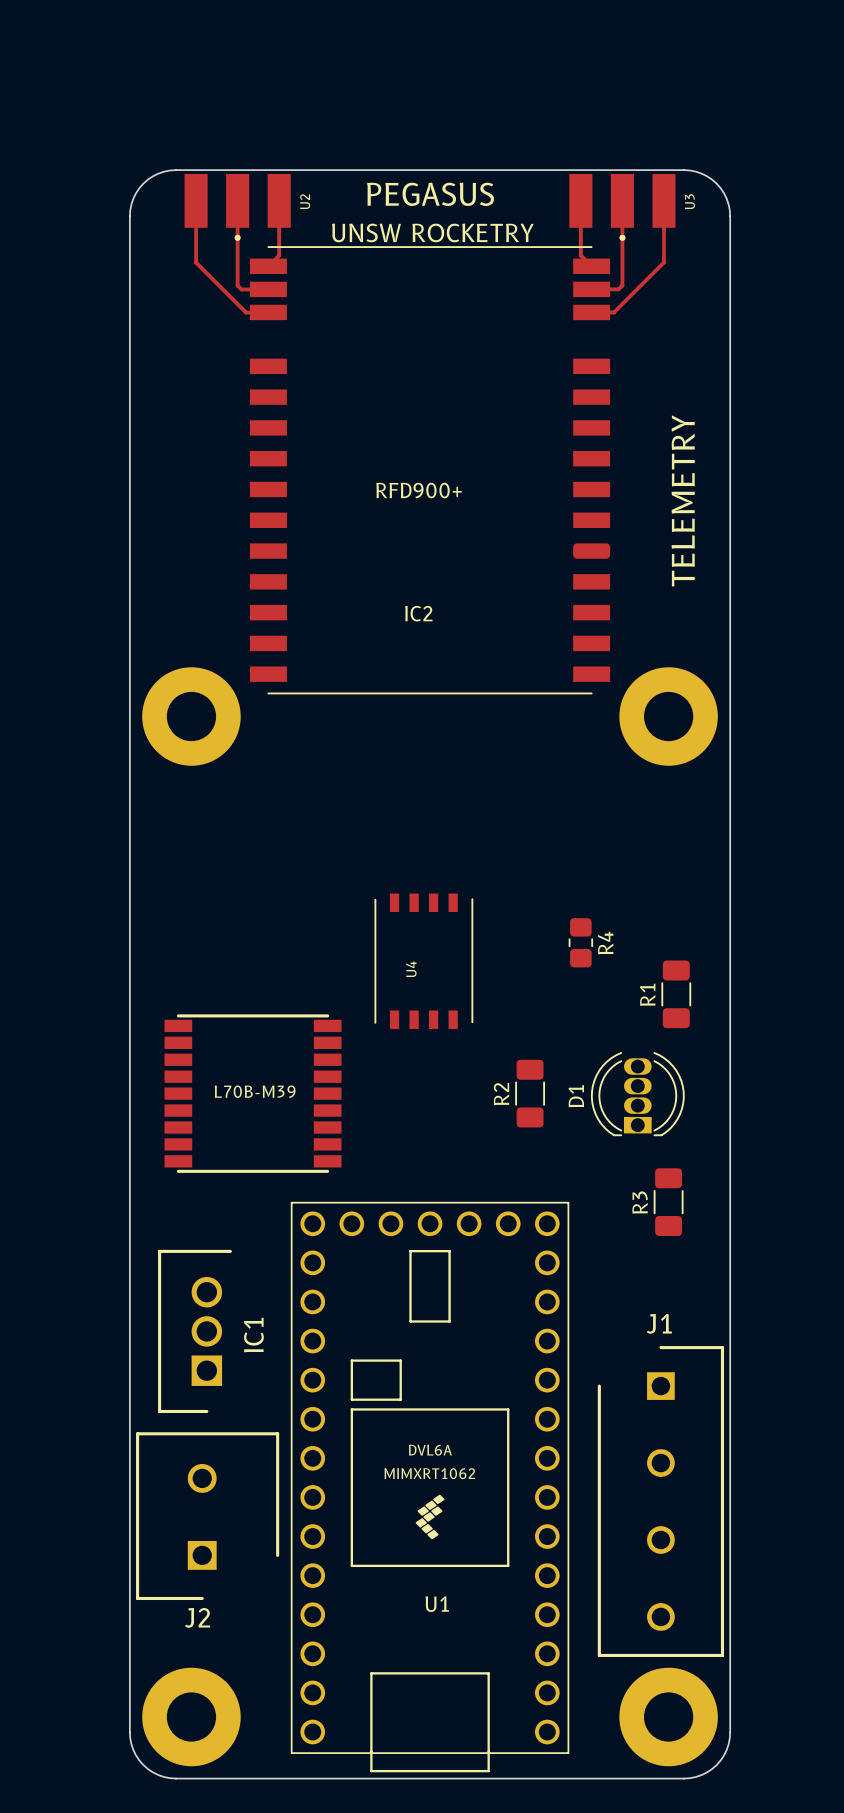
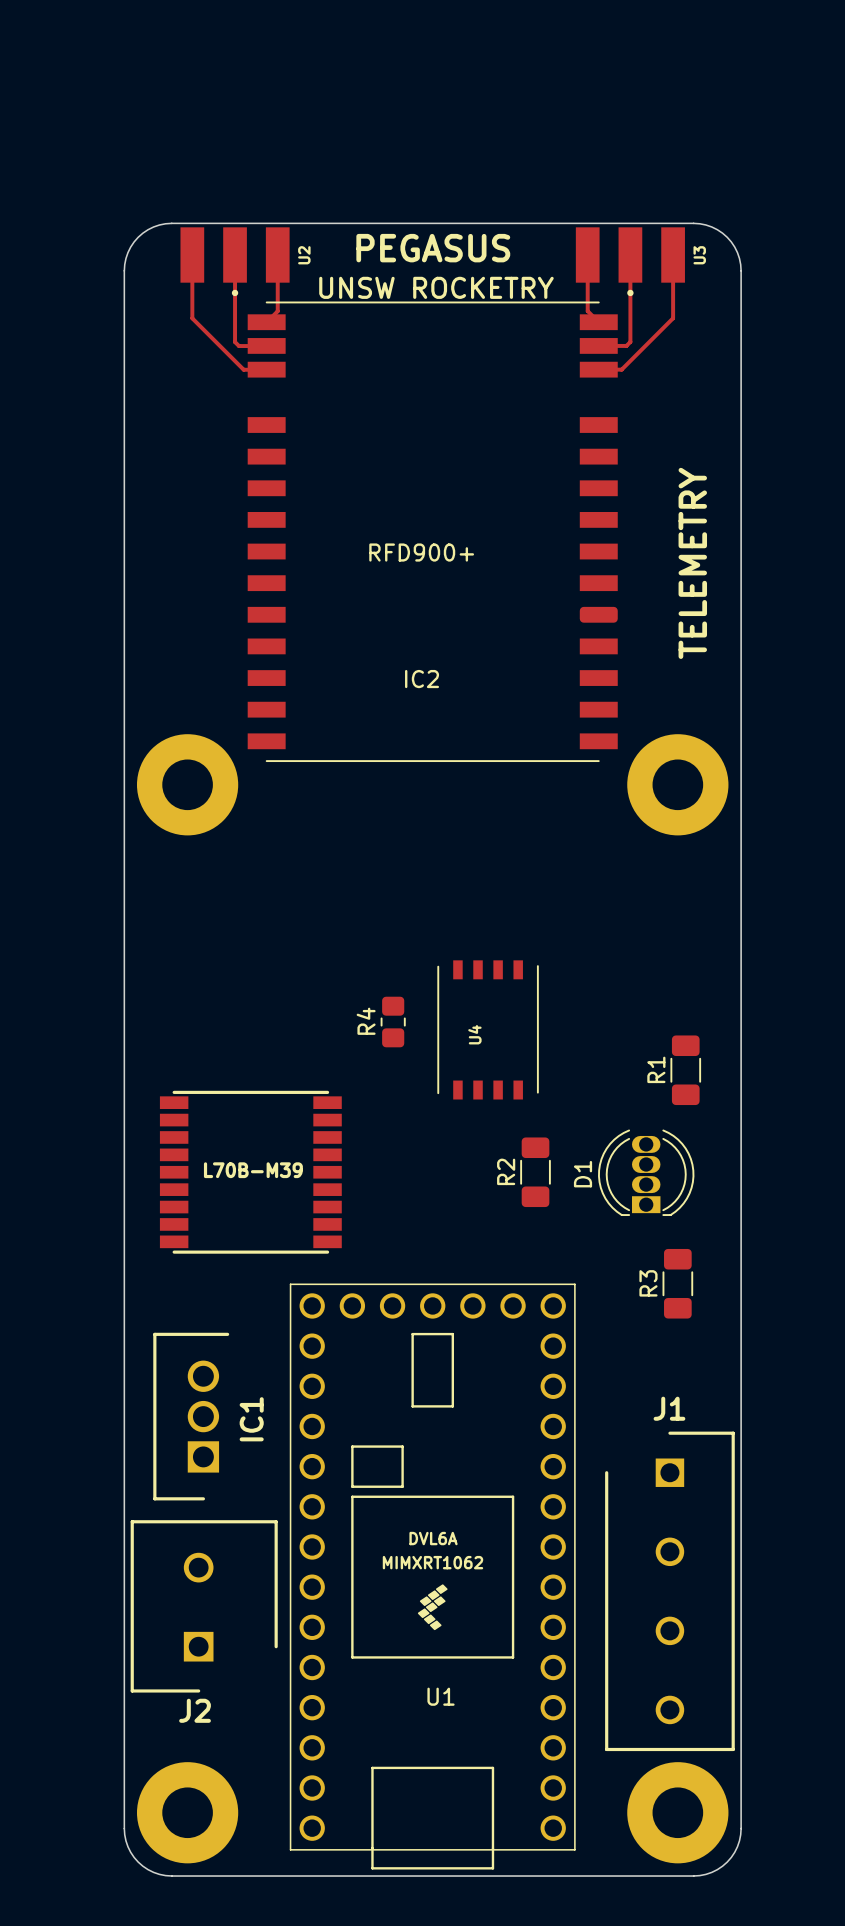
R4 position: (580, 942) -> (393, 1022)
R4 name position: R4 (605, 943) -> R4 (366, 1021)
U4 position: (423, 961) -> (488, 1029)

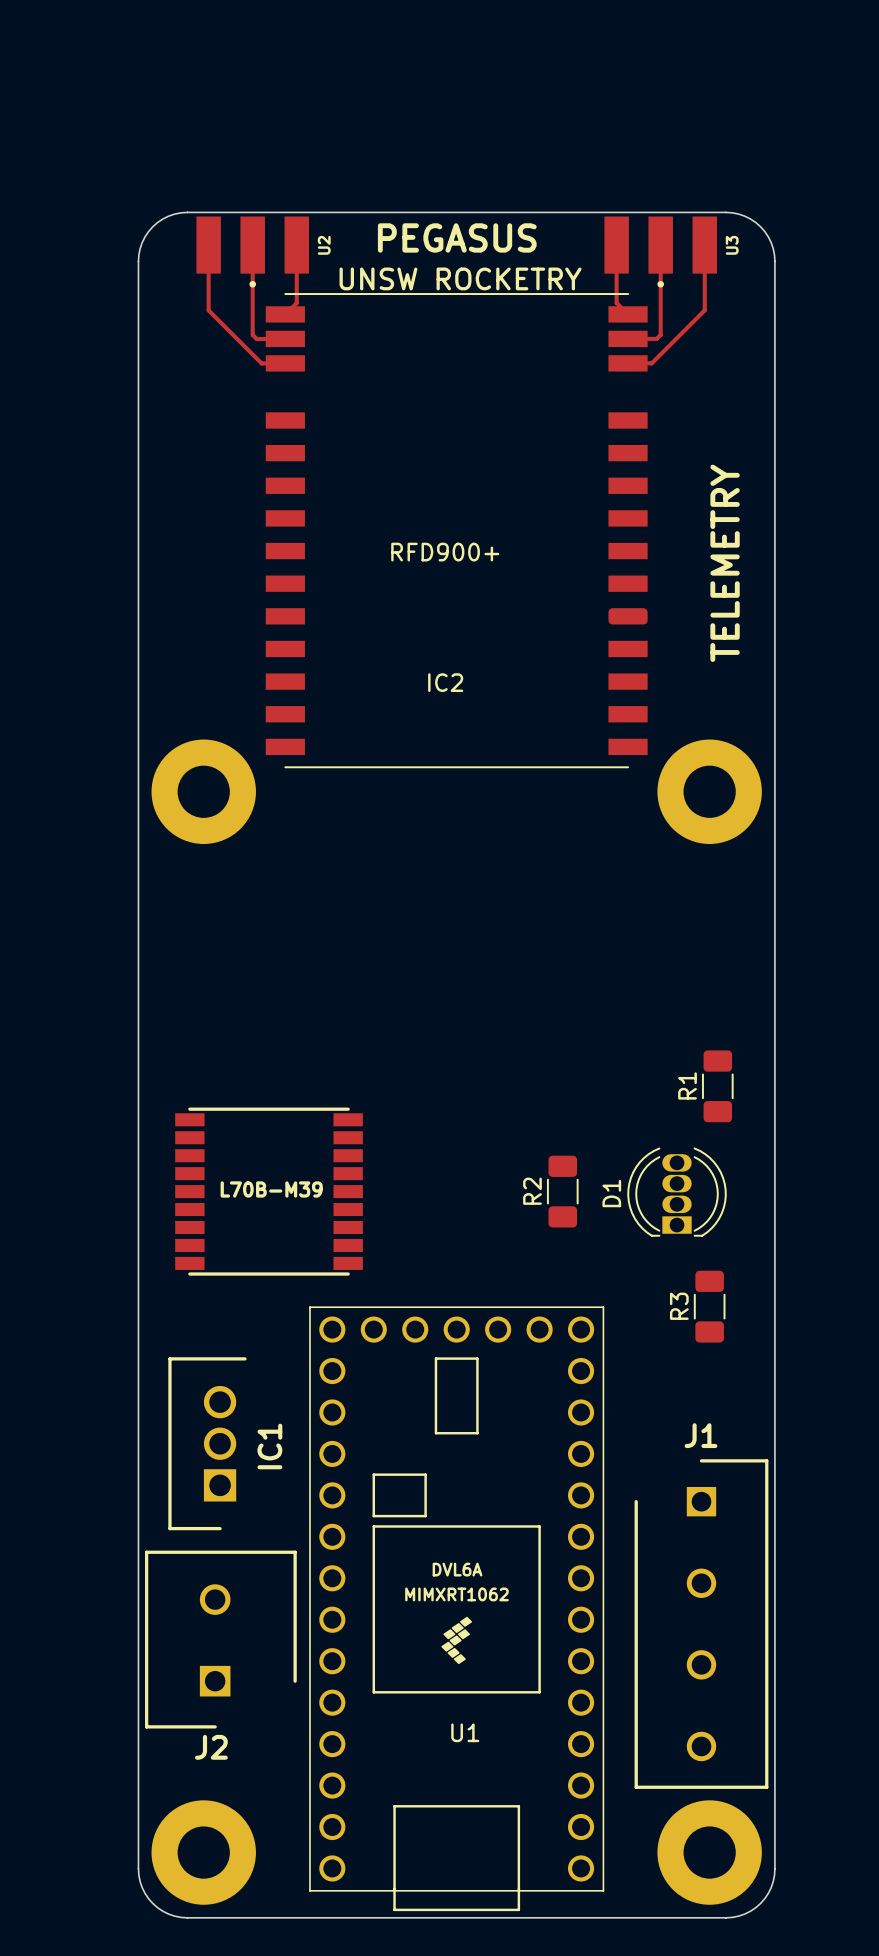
R4: (393, 1022) -> none
U4: (488, 1029) -> none

